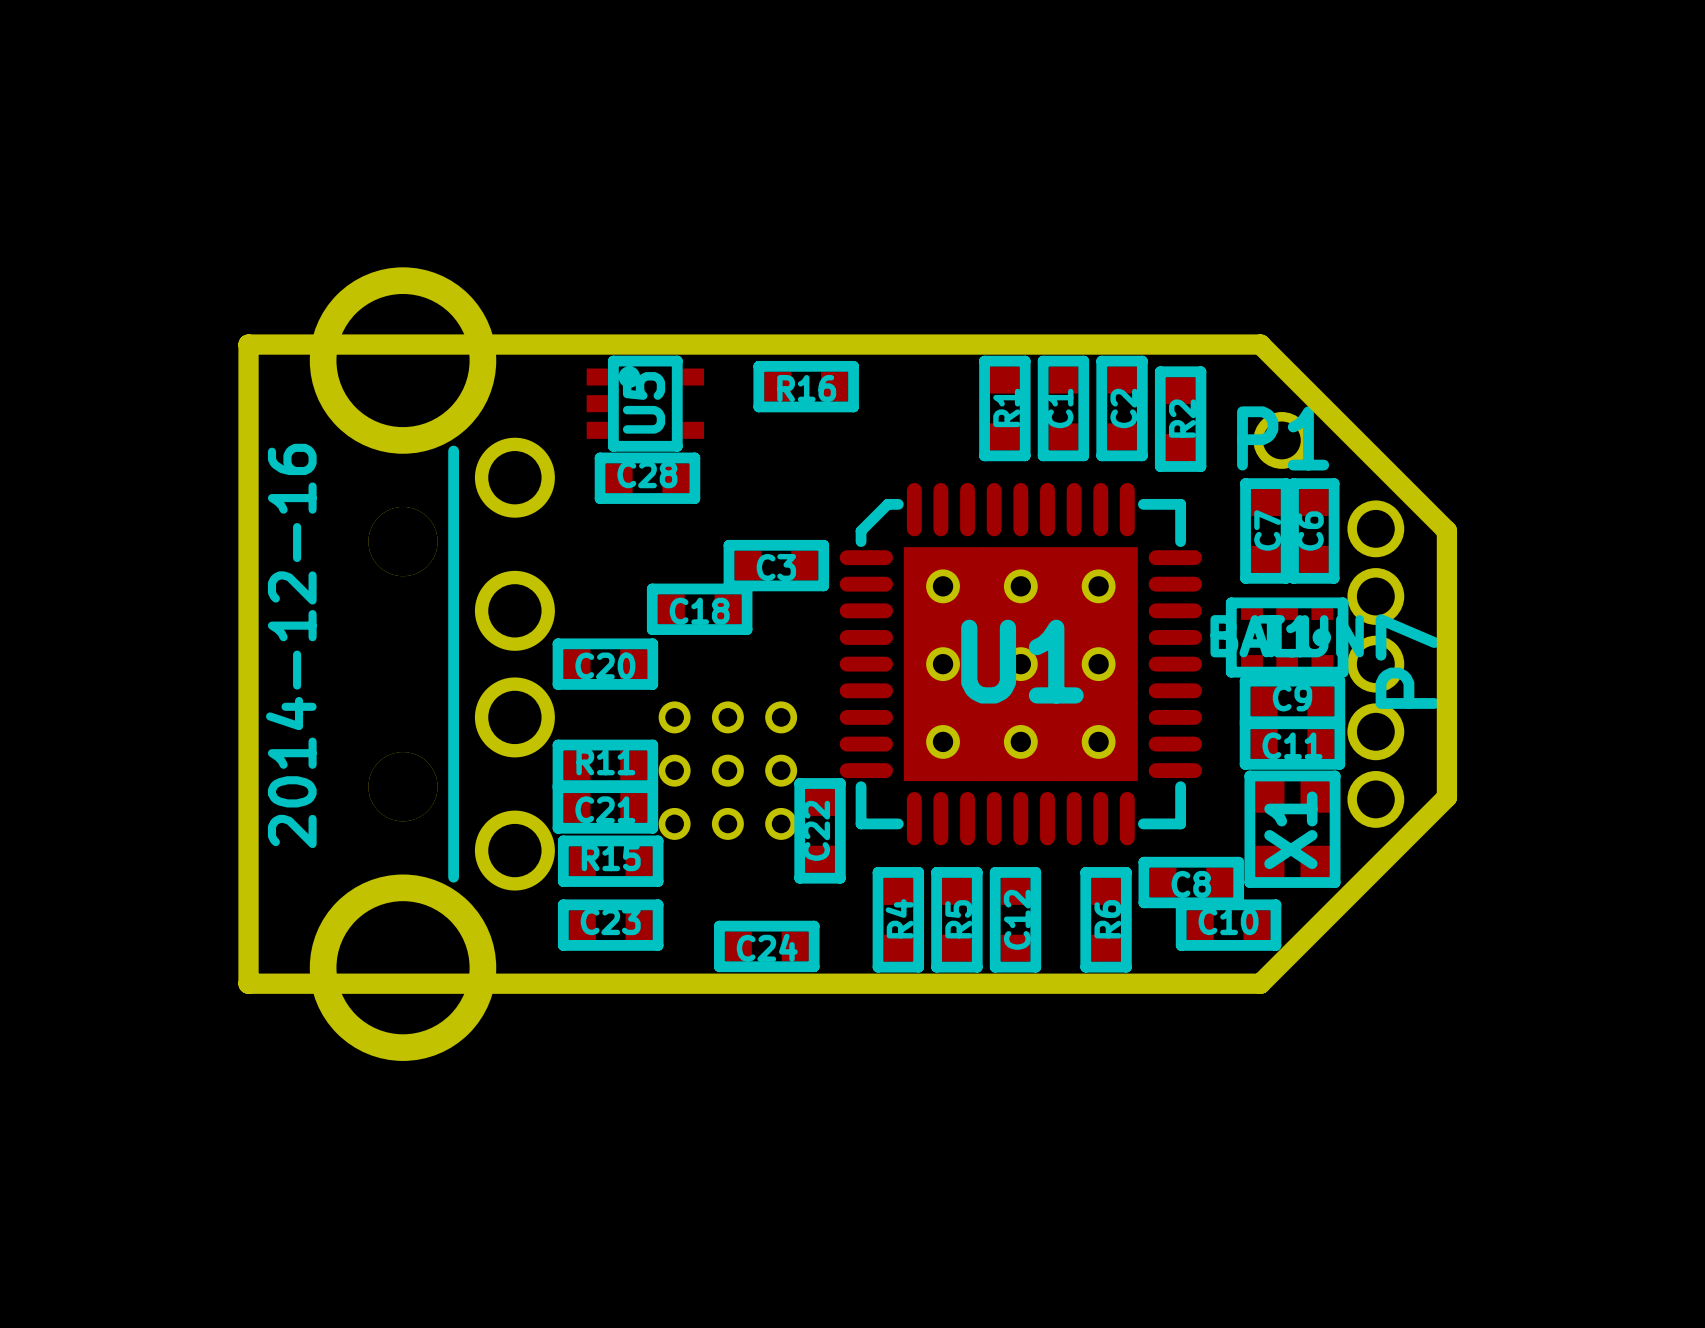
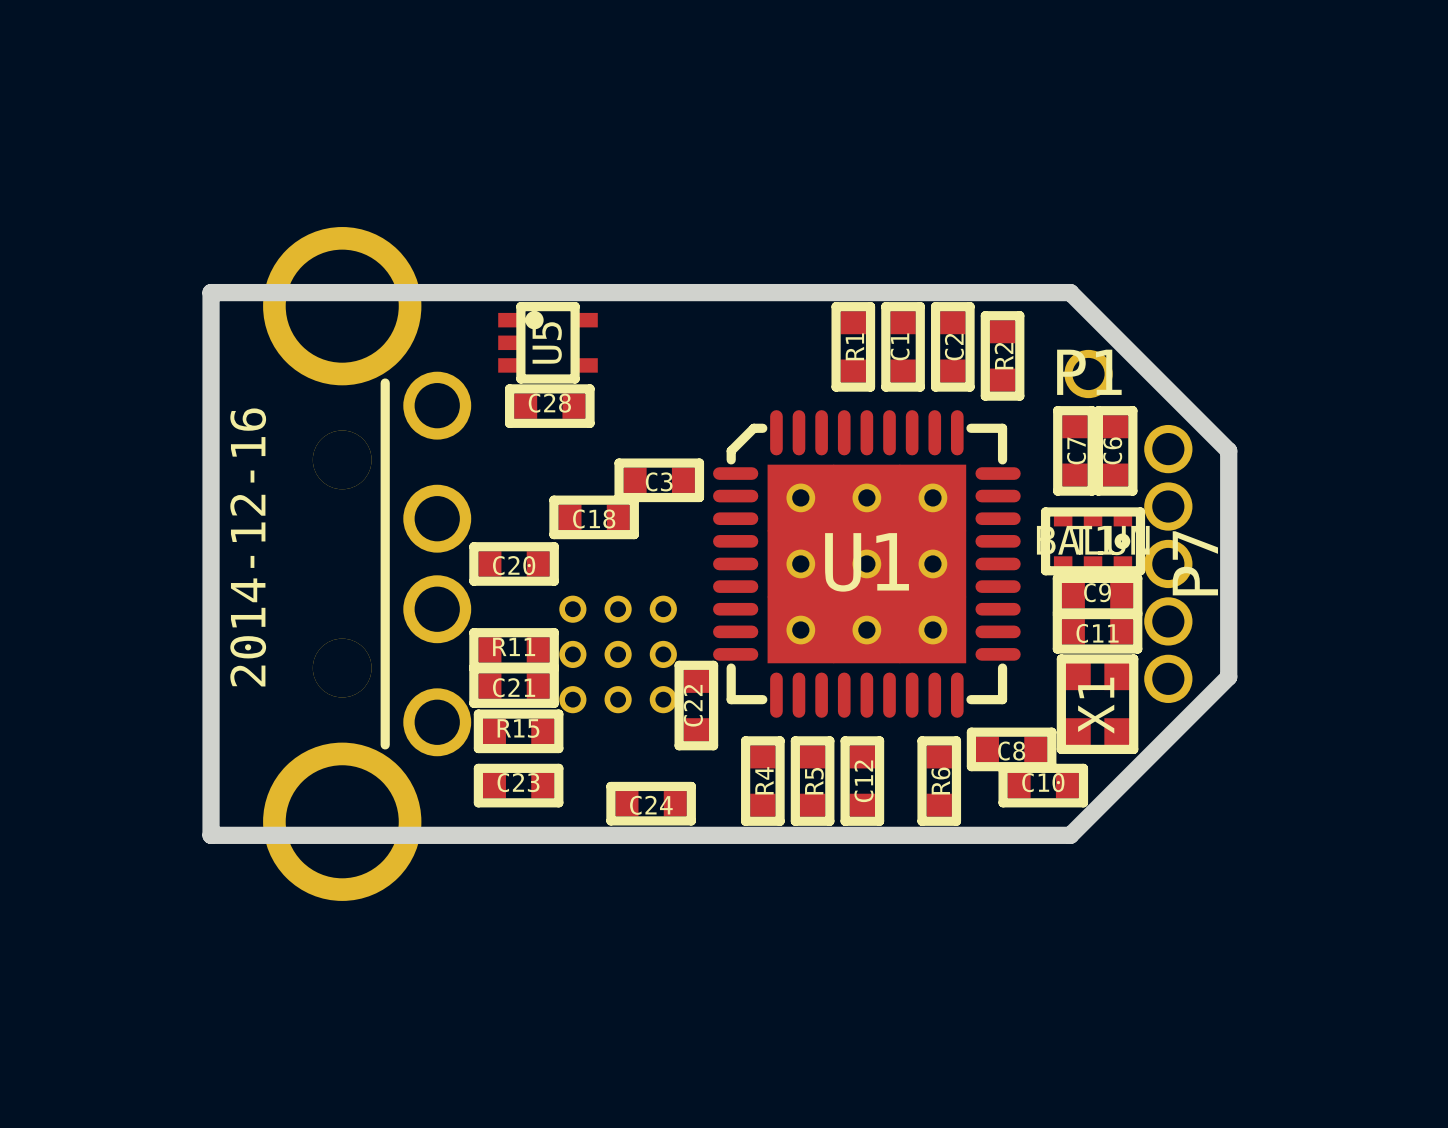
R16: (806, 386) -> none

